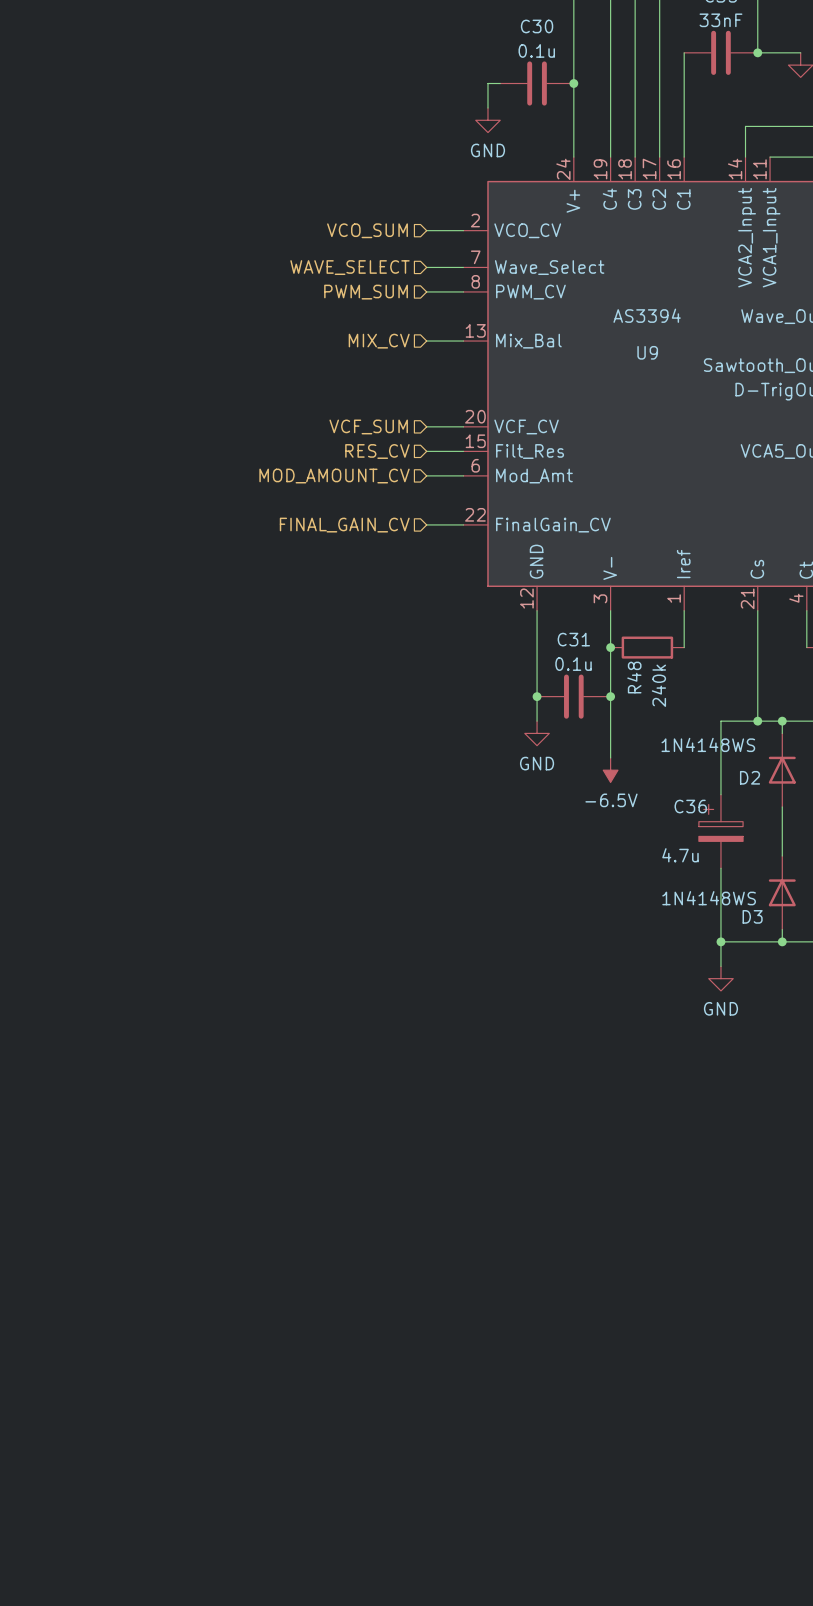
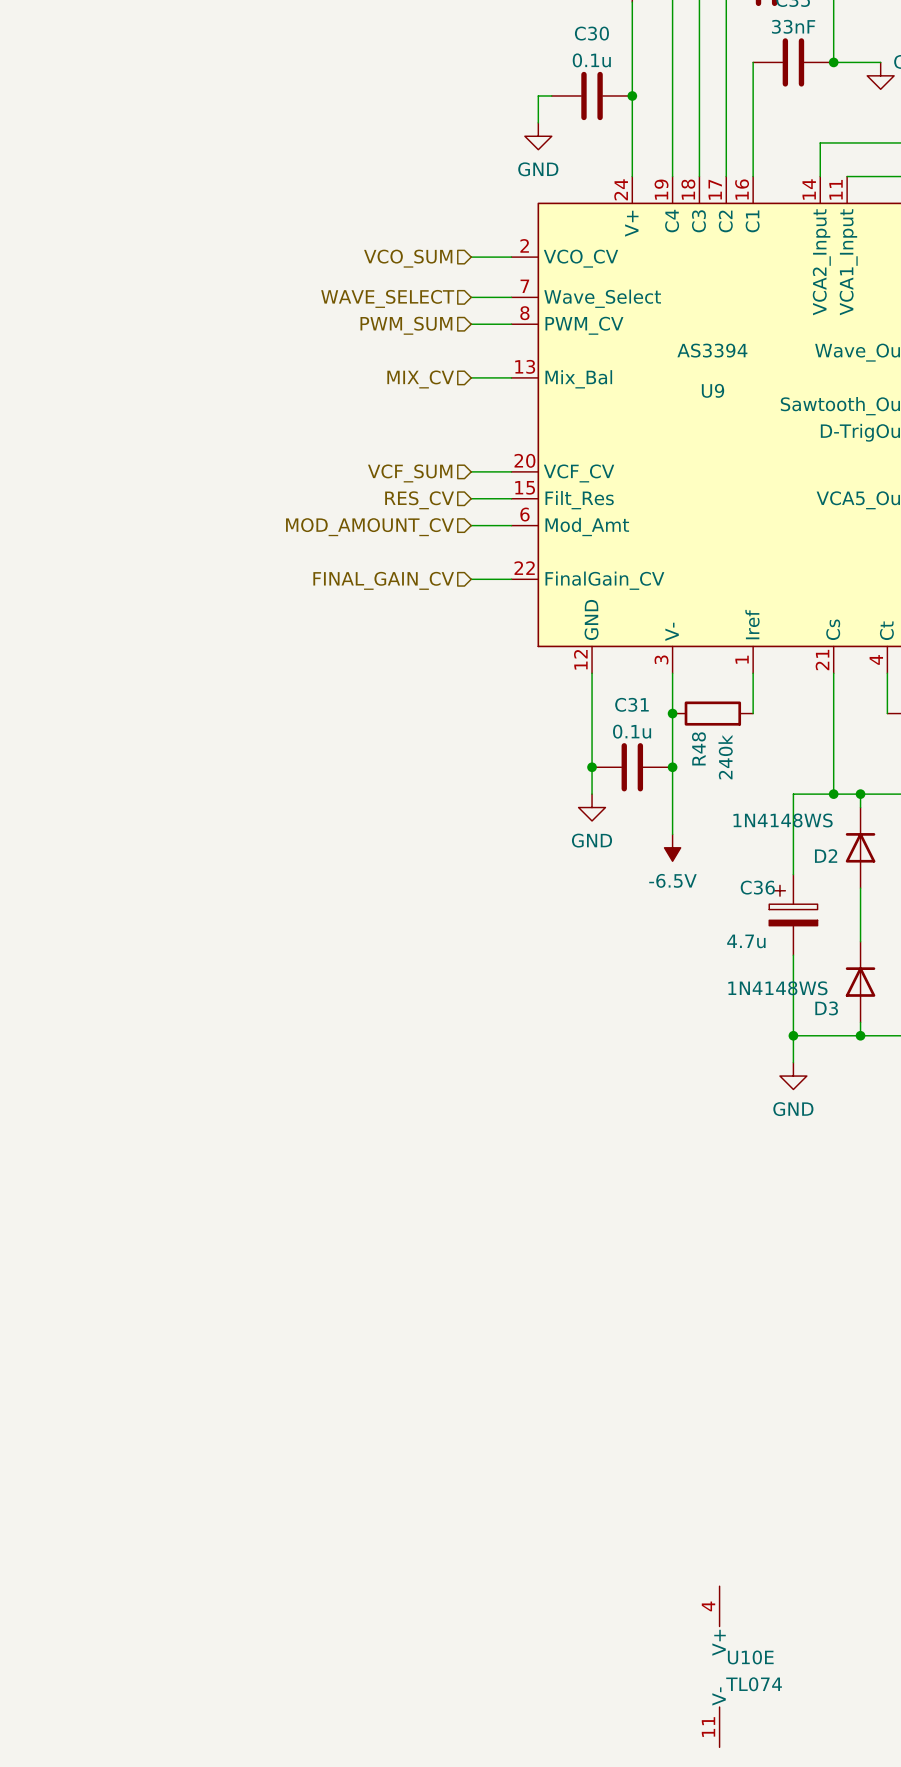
U10E: none -> TL074 (719, 1666)

